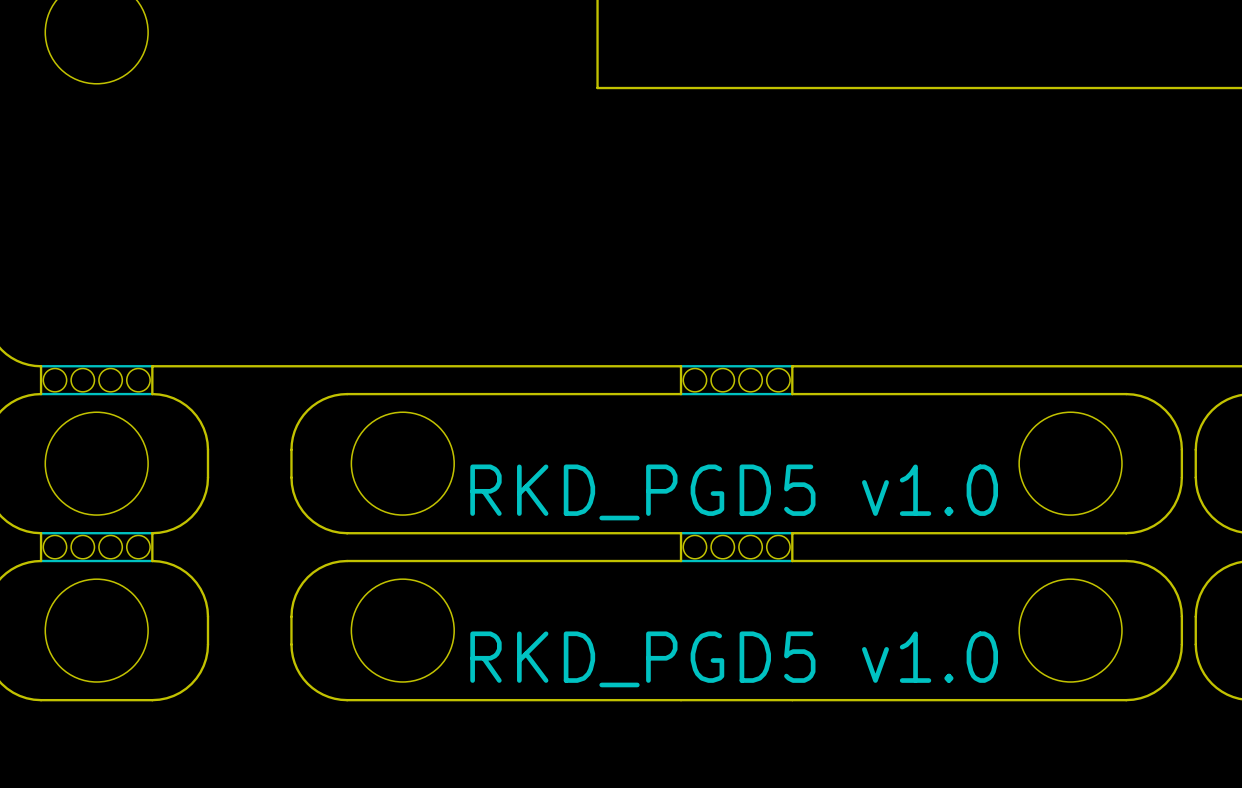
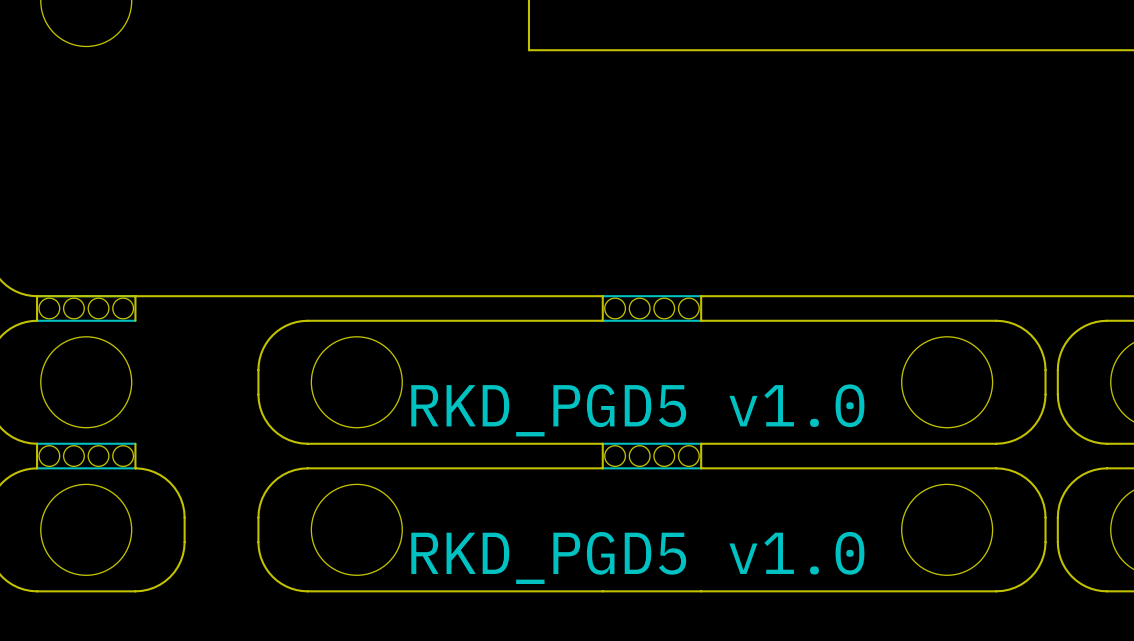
board edge: (681, 366) (152, 366) -> (602, 296) (37, 296)
board edge: (152, 394) (173, 398) (191, 410) (203, 428) (207, 449) (207, 484) (200, 505) (191, 516) (180, 525) (166, 531) (152, 533) -> none

